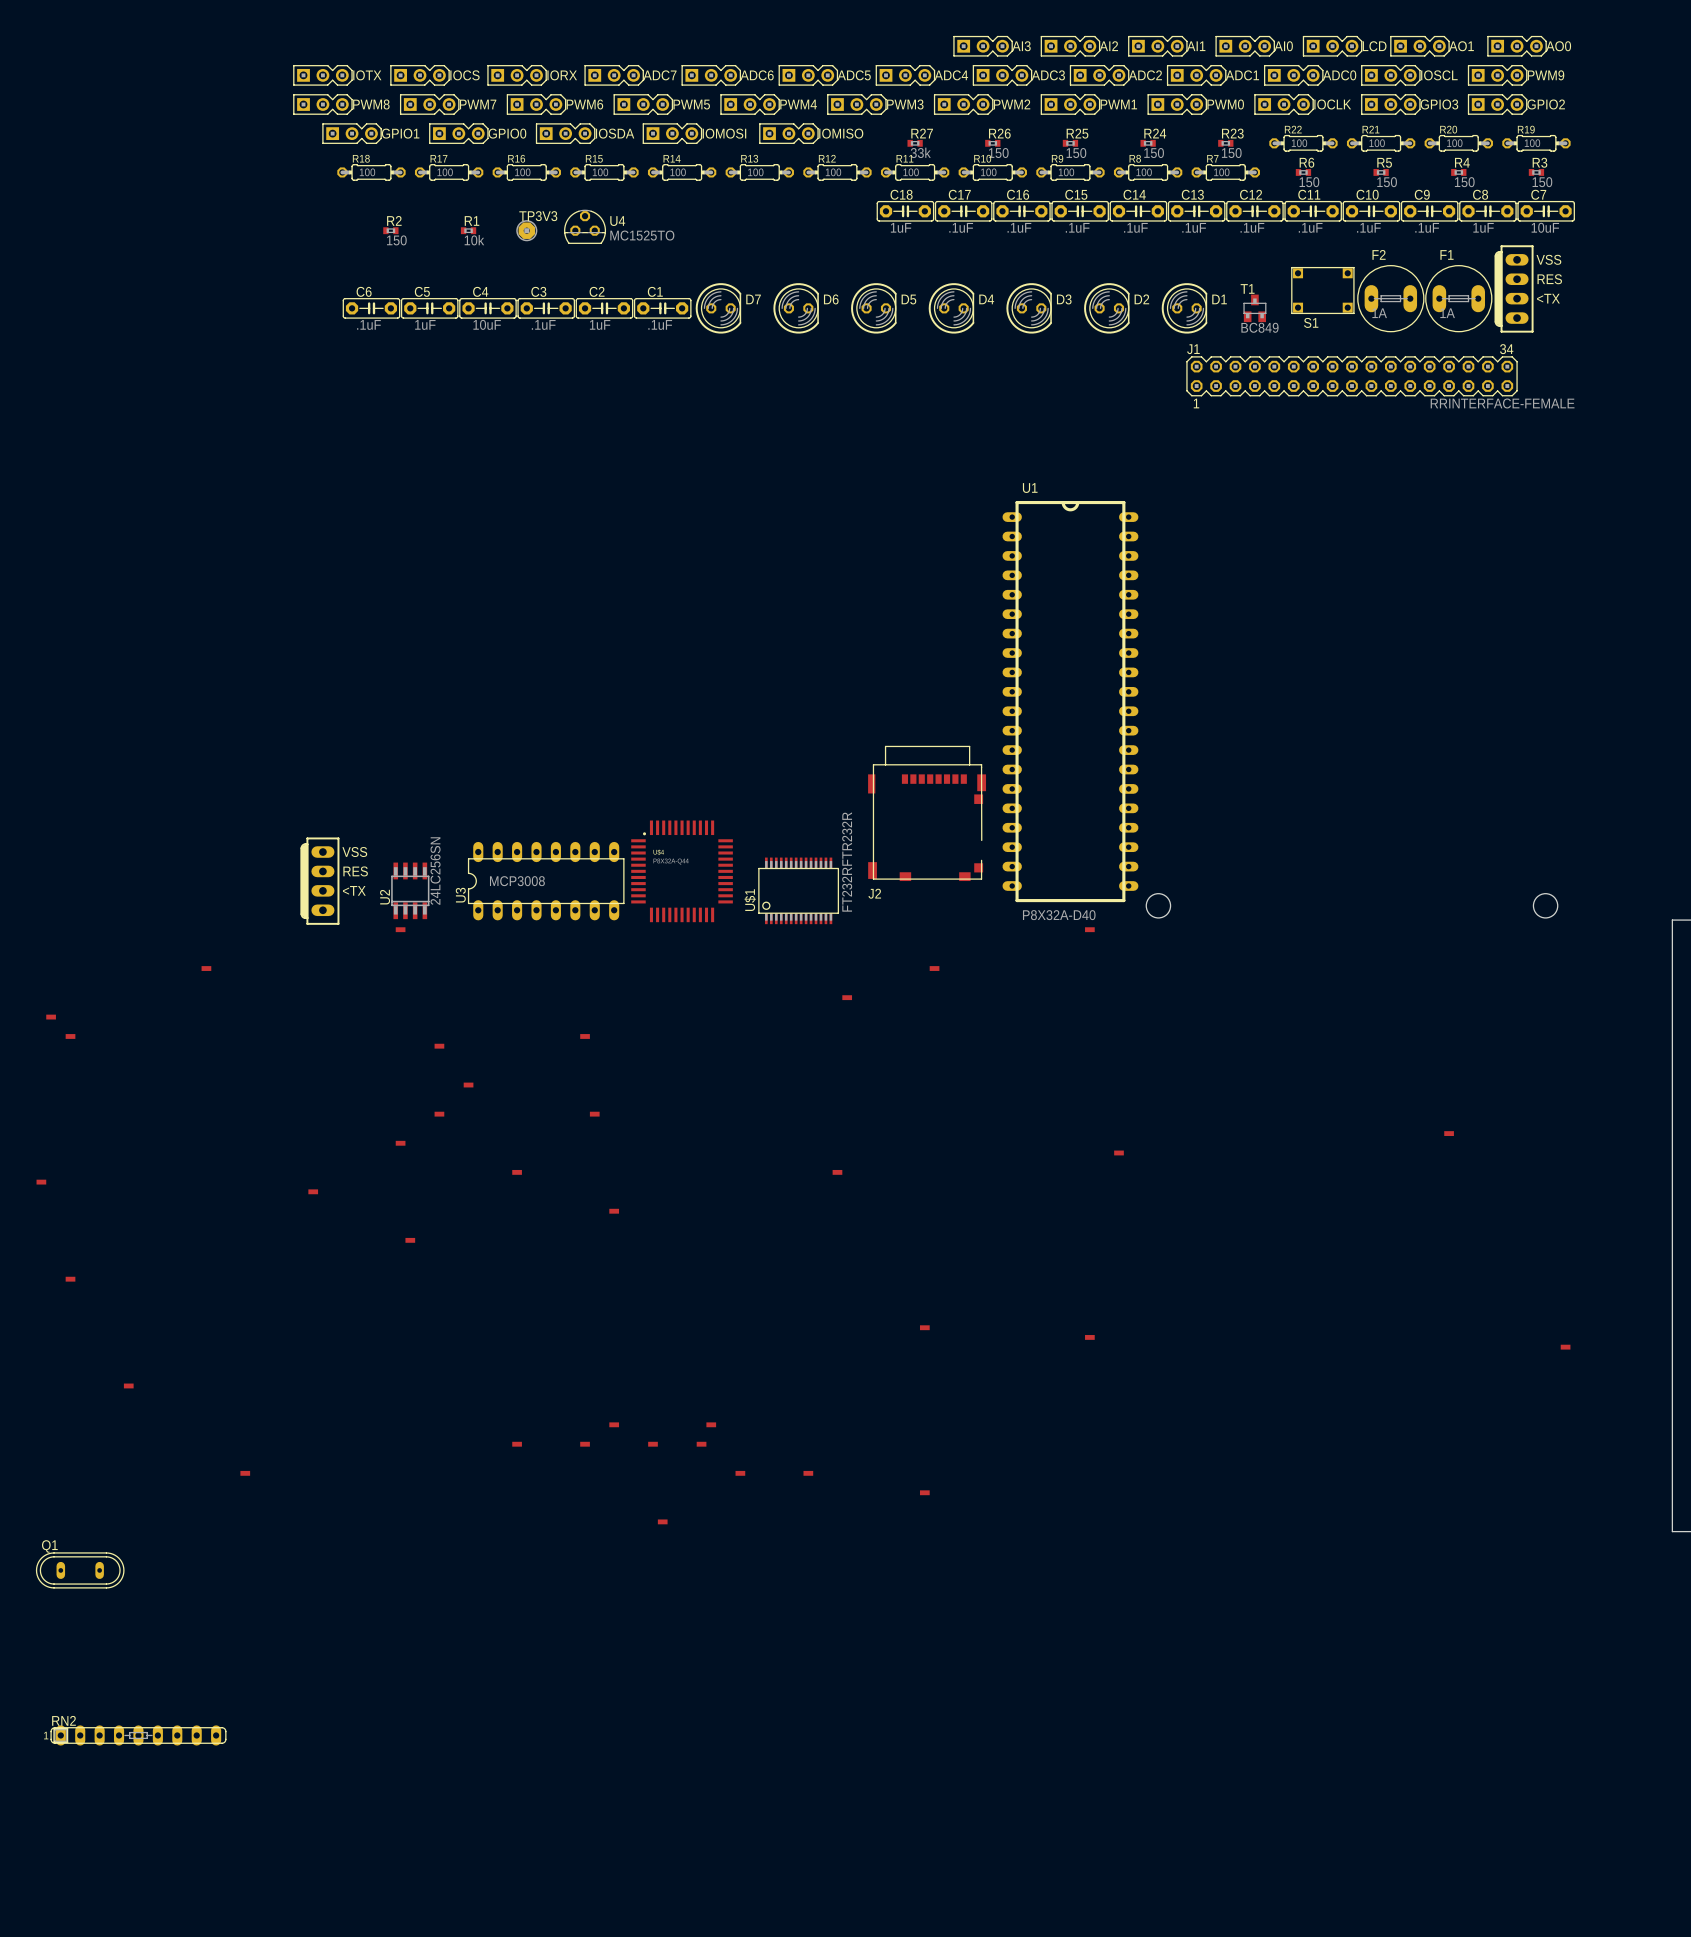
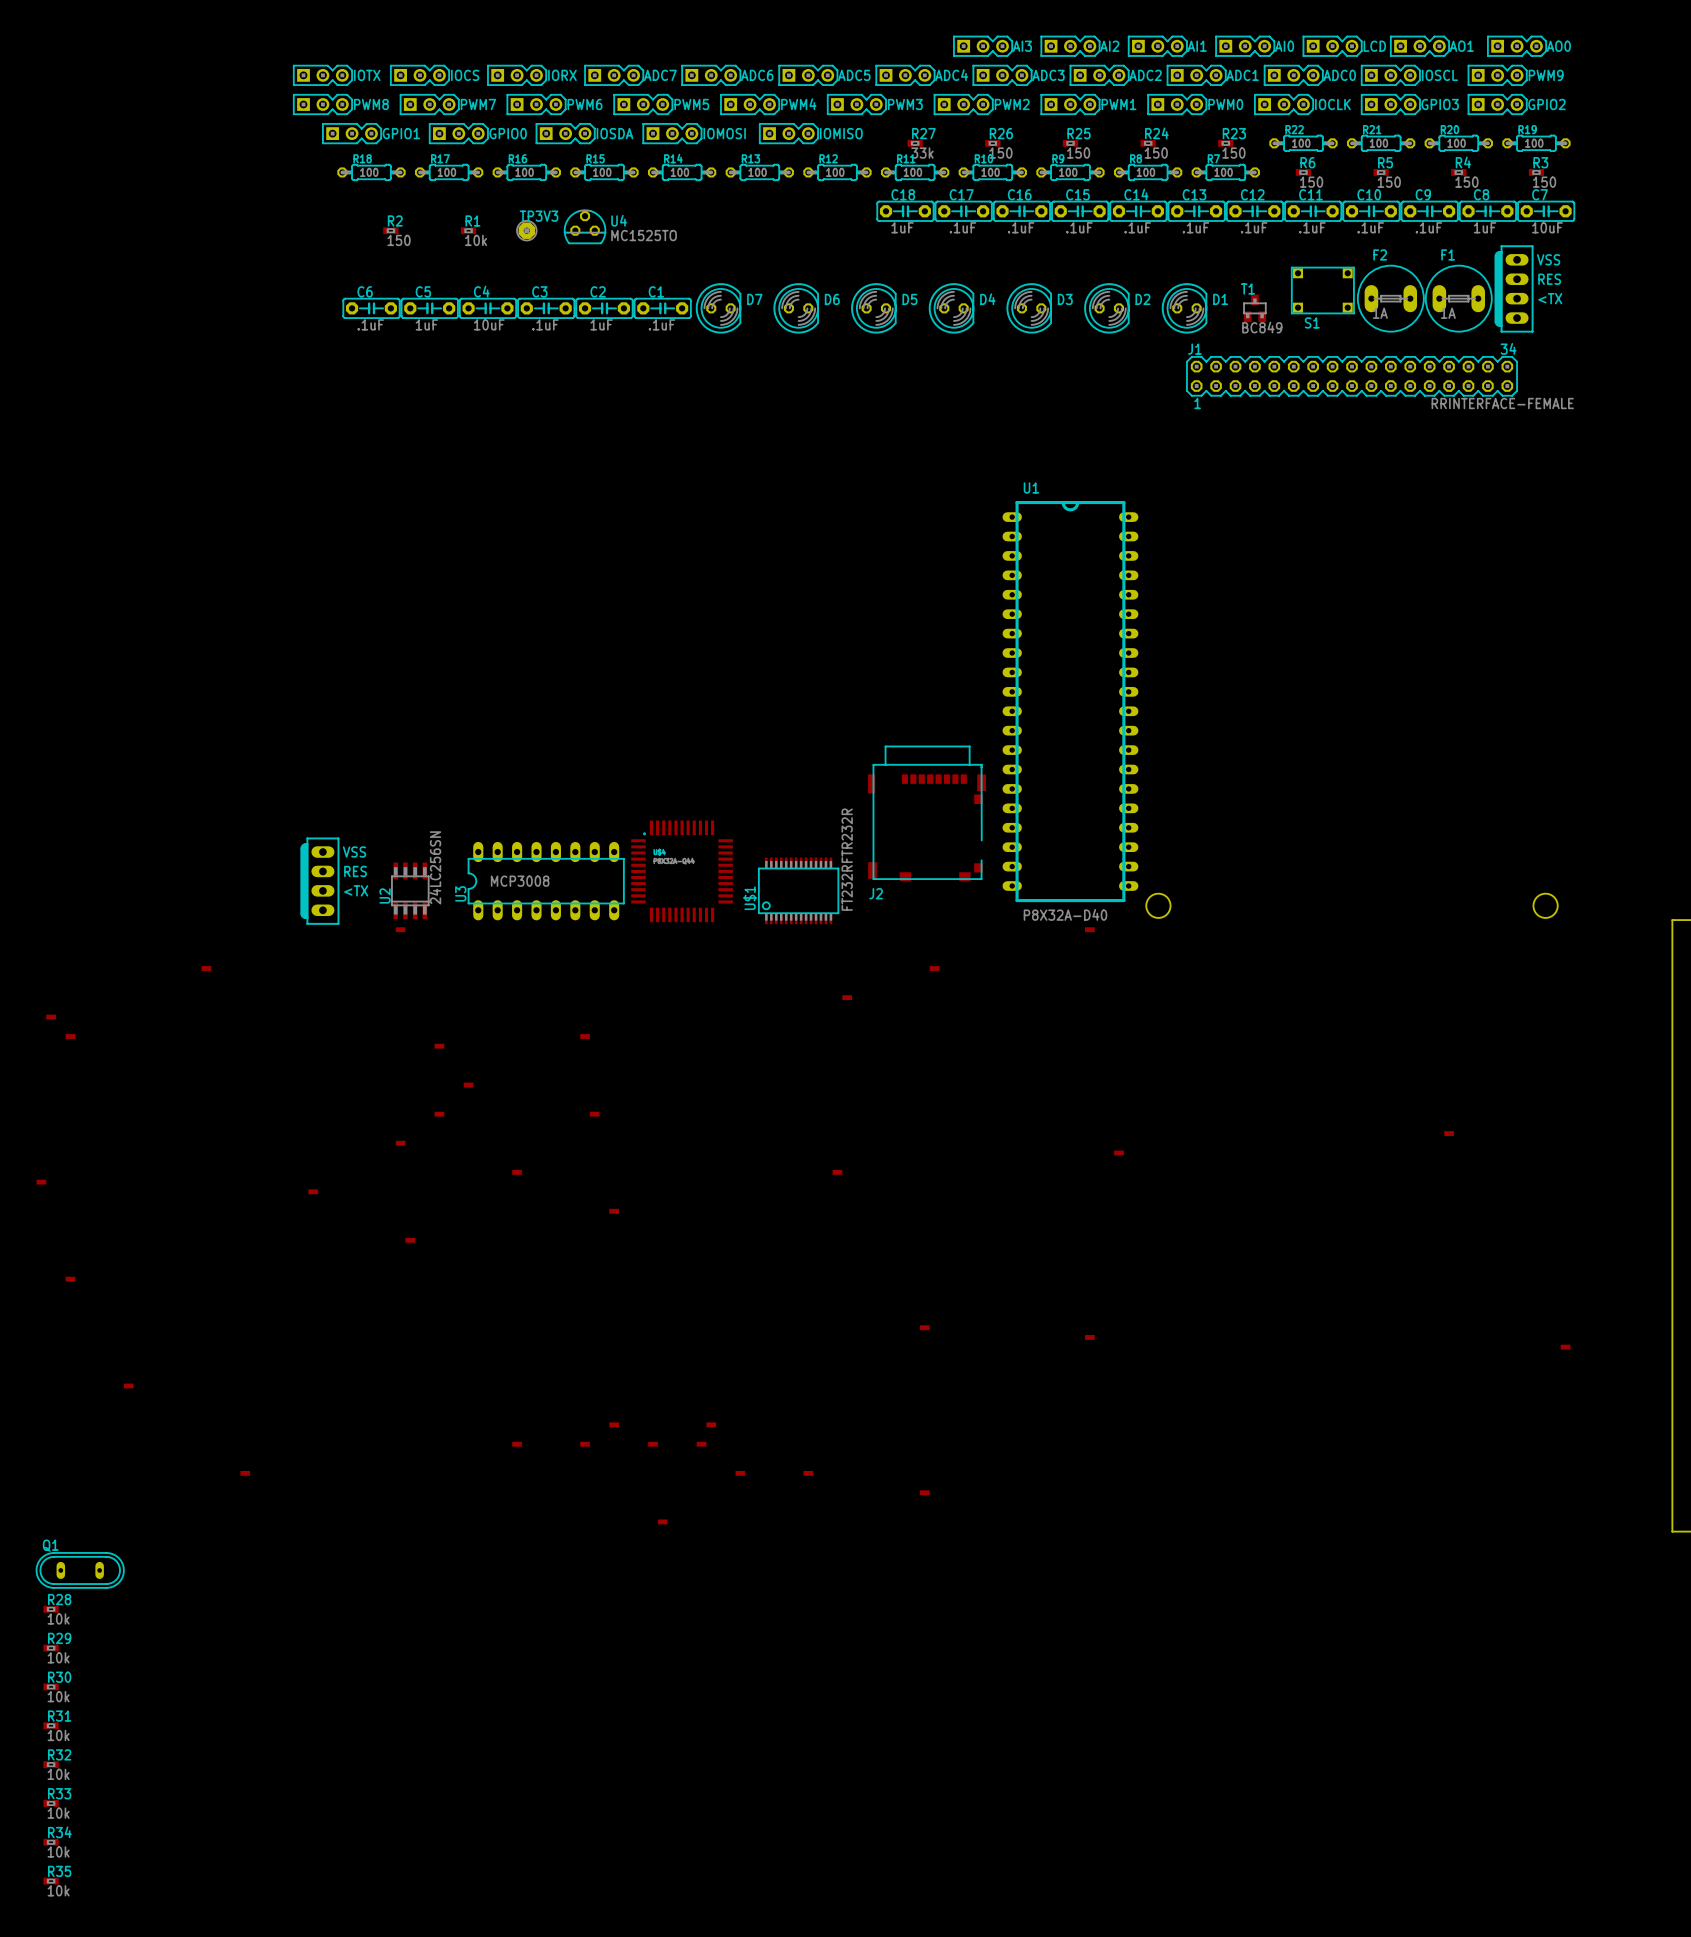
R28: none -> 10k (51, 1609)
R29: none -> 10k (51, 1648)
R30: none -> 10k (51, 1686)
R31: none -> 10k (51, 1725)
RN2: (138, 1735) -> none
R32: none -> 10k (51, 1764)
R33: none -> 10k (51, 1803)
R34: none -> 10k (51, 1842)
R35: none -> 10k (51, 1881)

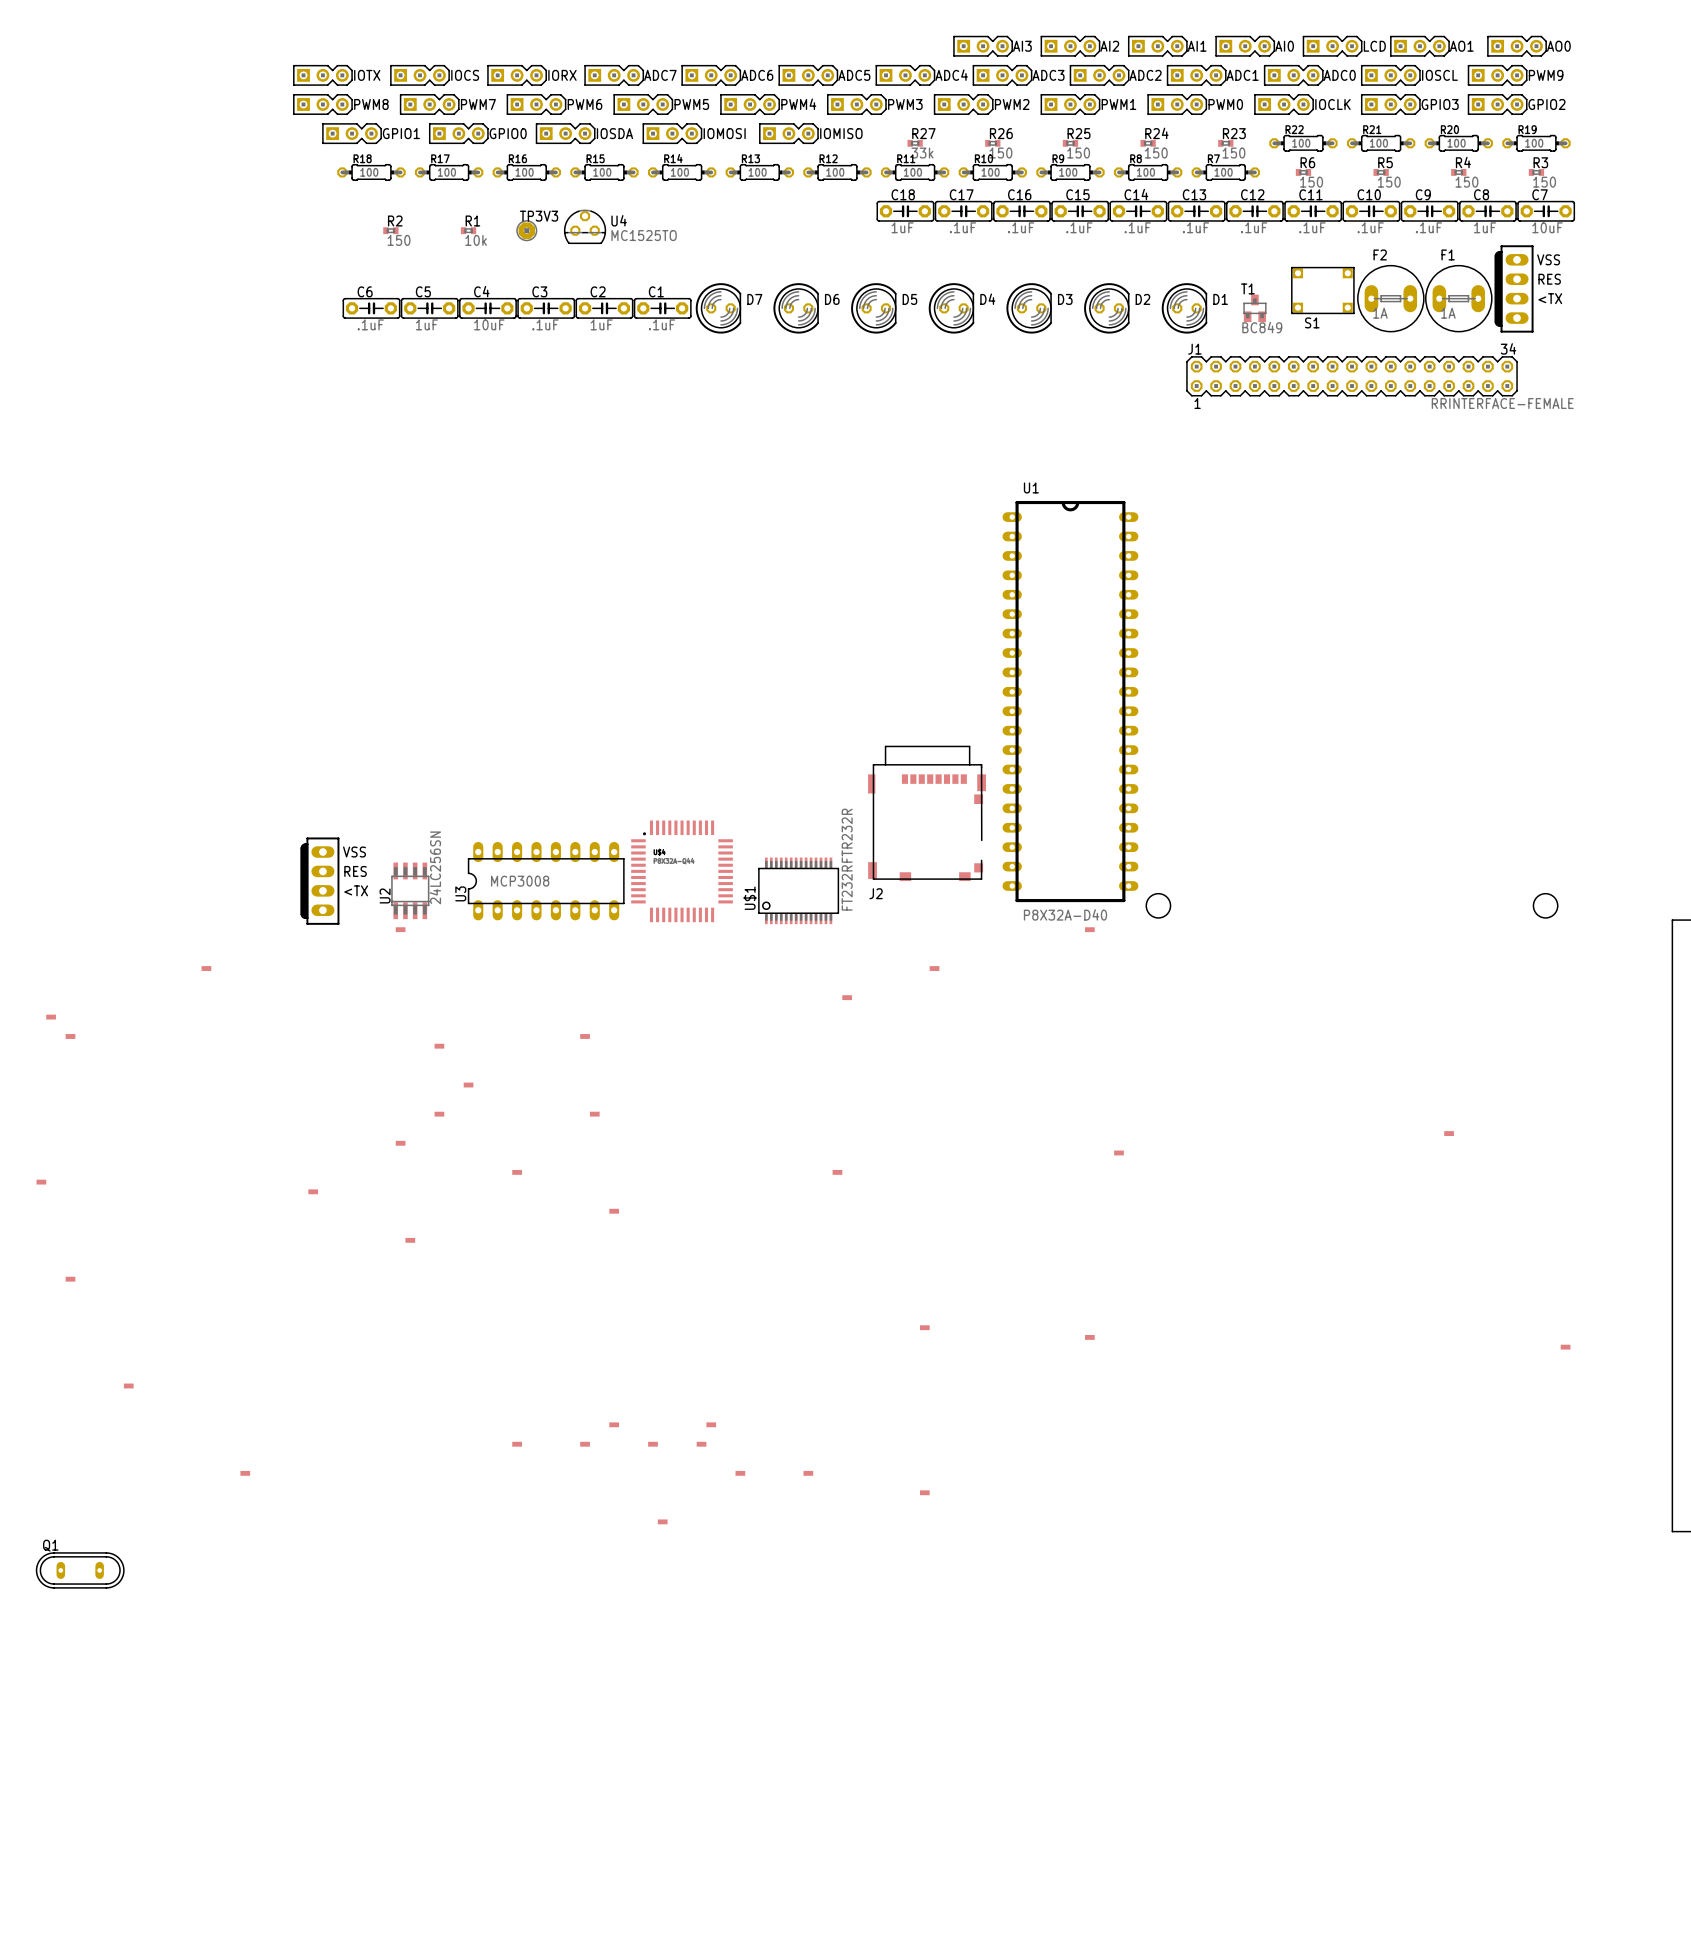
R28: 10k (51, 1609) -> none
R29: 10k (51, 1648) -> none
R30: 10k (51, 1686) -> none
R31: 10k (51, 1725) -> none
R32: 10k (51, 1764) -> none
R33: 10k (51, 1803) -> none
R34: 10k (51, 1842) -> none
R35: 10k (51, 1881) -> none

